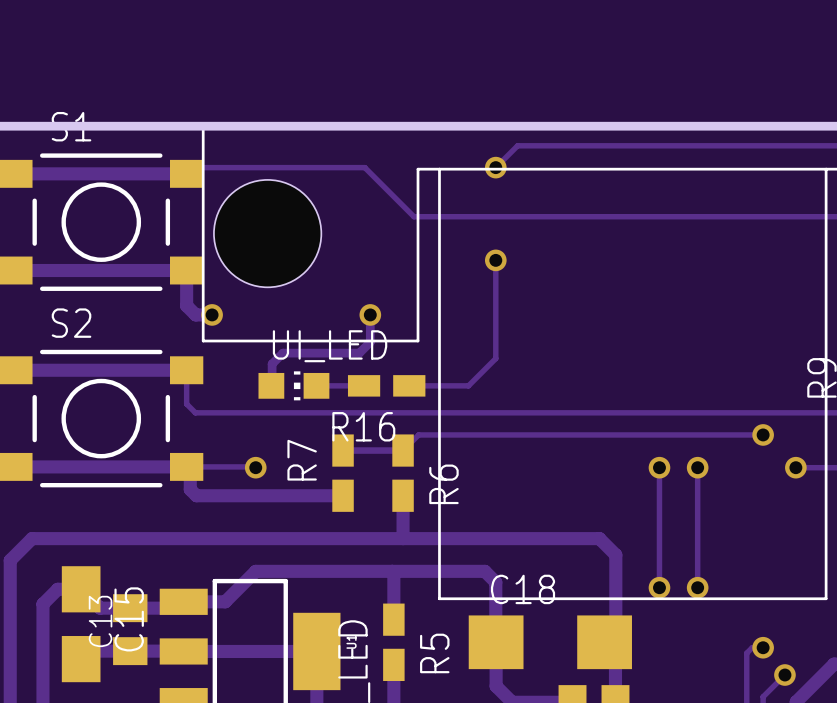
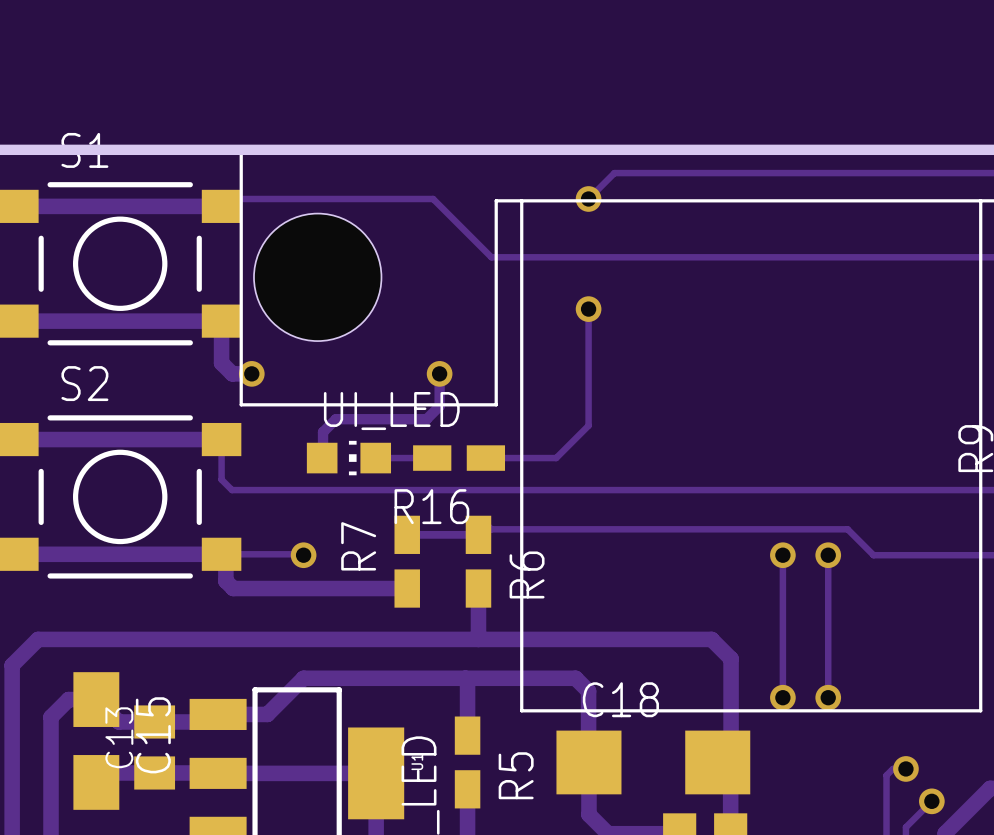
track: (763, 434) (418, 434) (403, 450) -> (944, 555) (873, 555) (847, 529) (491, 529) (484, 522) (478, 529) (478, 534)
via: (763, 434) -> none
via: (795, 467) -> none

